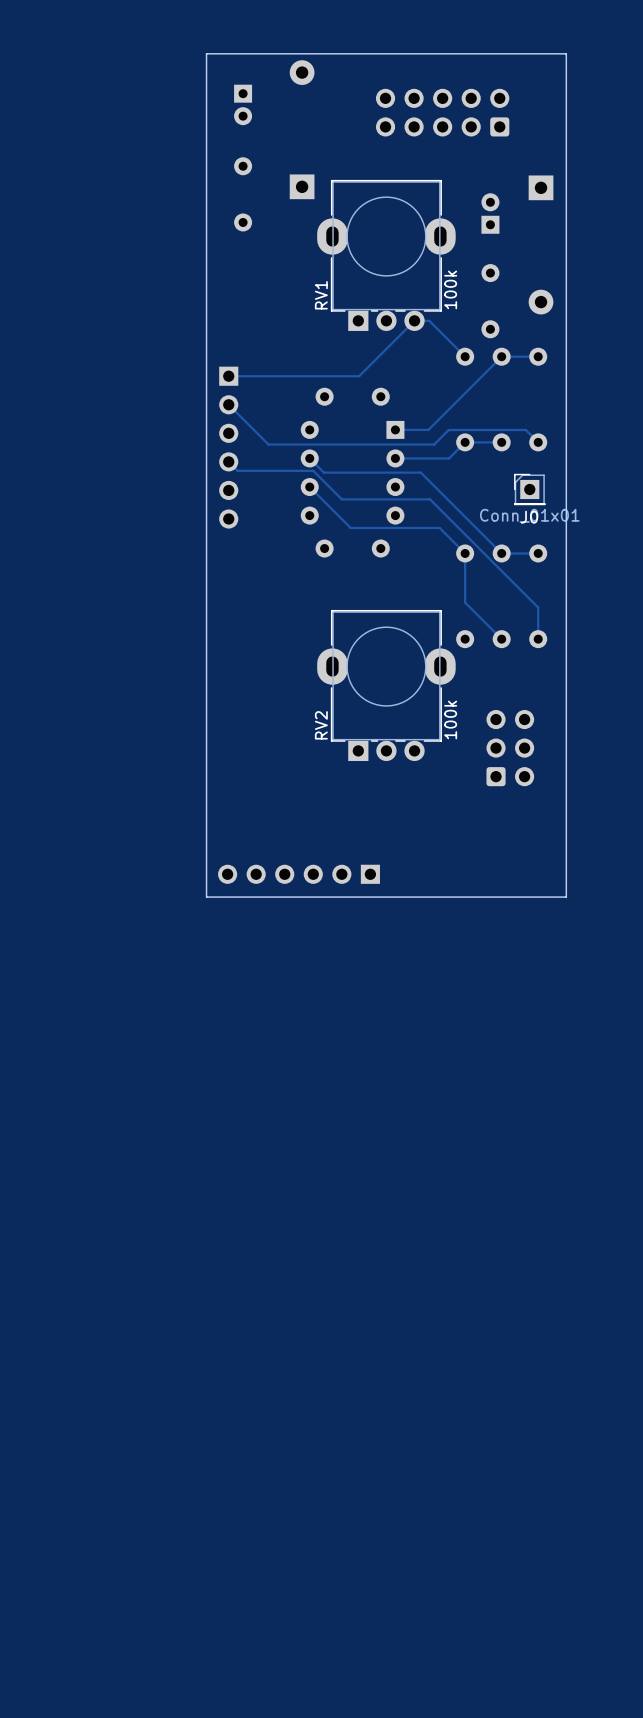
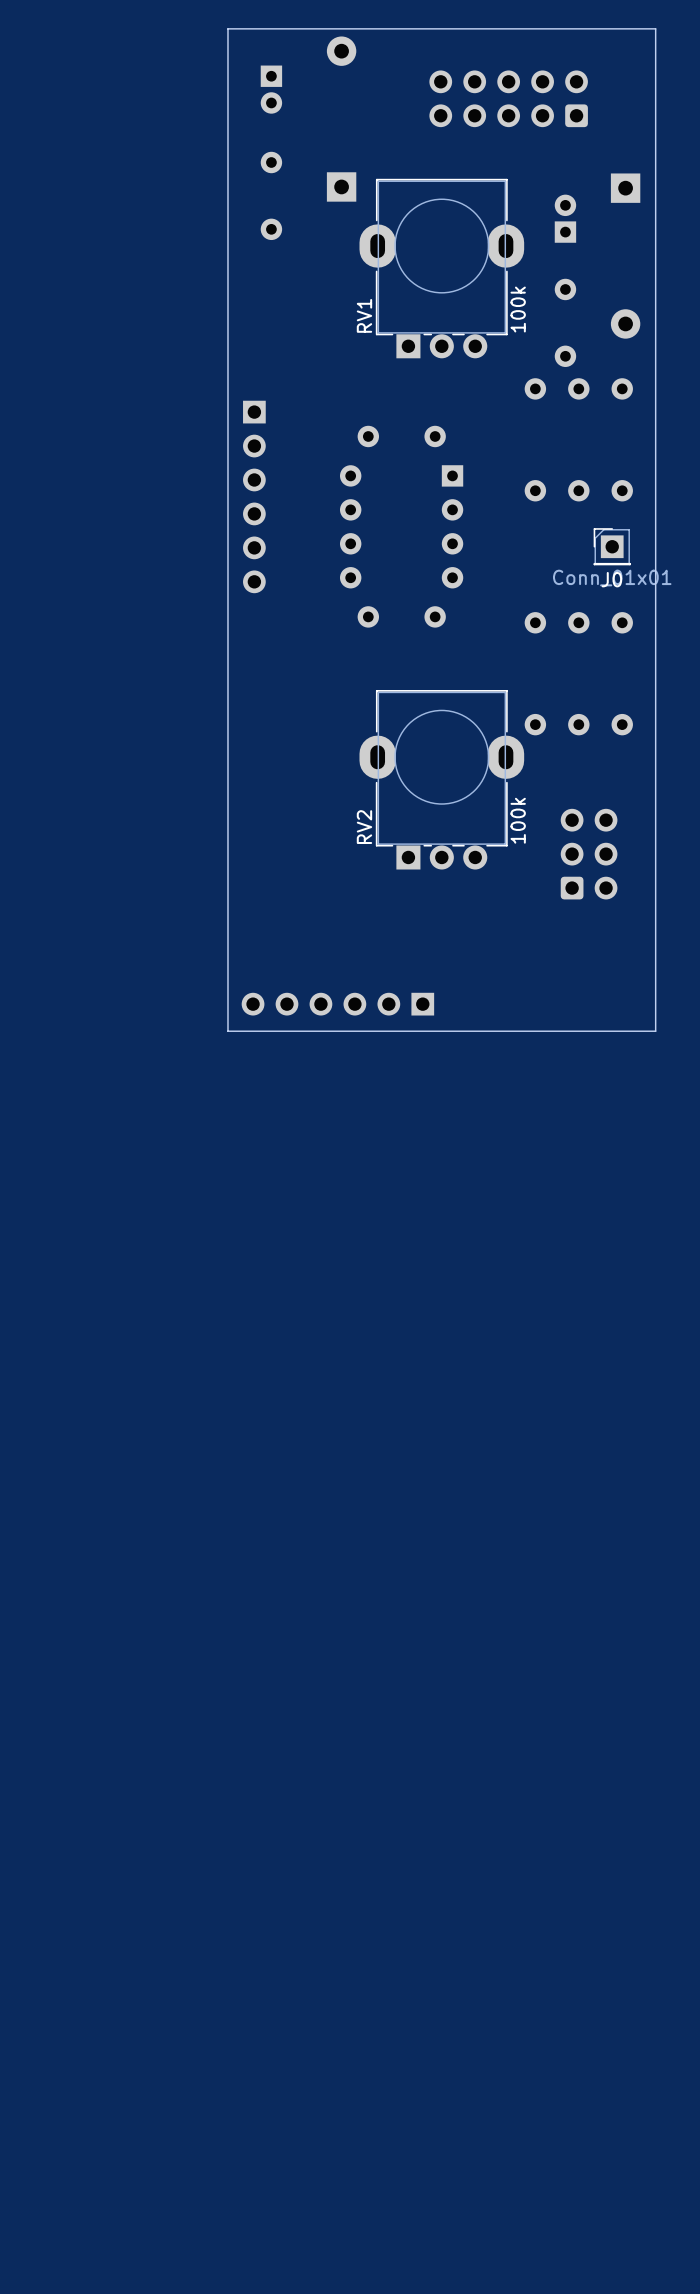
track: (465, 356) (429, 320) (414, 320) (359, 376) (228, 376) -> none
track: (538, 356) (501, 356) (428, 429) (395, 429) -> none
track: (228, 404) (268, 444) (434, 444) (448, 430) (525, 430) (538, 442) -> none
track: (501, 442) (465, 442) (449, 458) (395, 458) -> none
track: (309, 458) (323, 472) (420, 472) (501, 553) (538, 553) -> none
track: (228, 461) (237, 470) (313, 470) (341, 499) (430, 499) (538, 607) (538, 639) -> none
track: (309, 487) (350, 527) (439, 527) (465, 553) (465, 602) (501, 639) -> none

